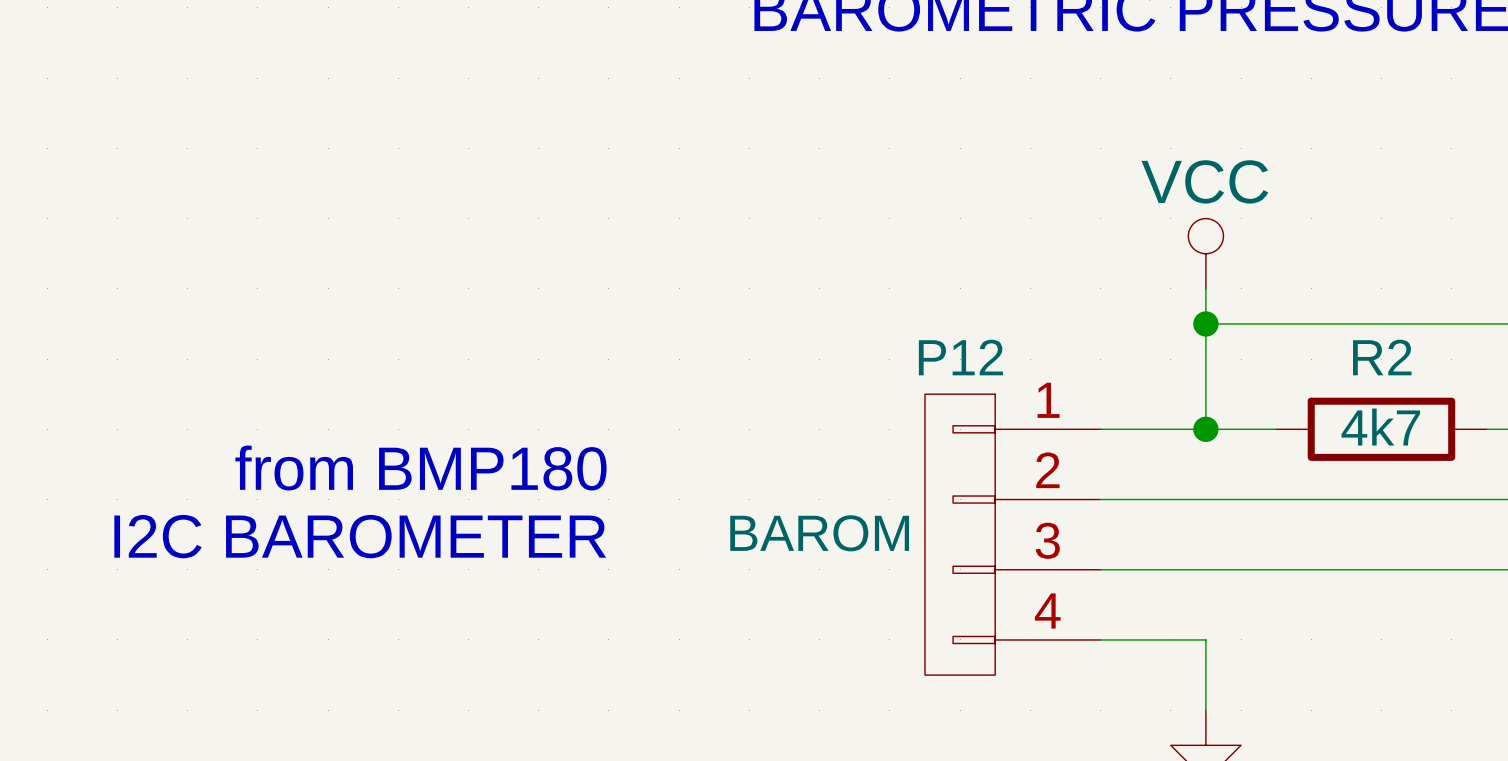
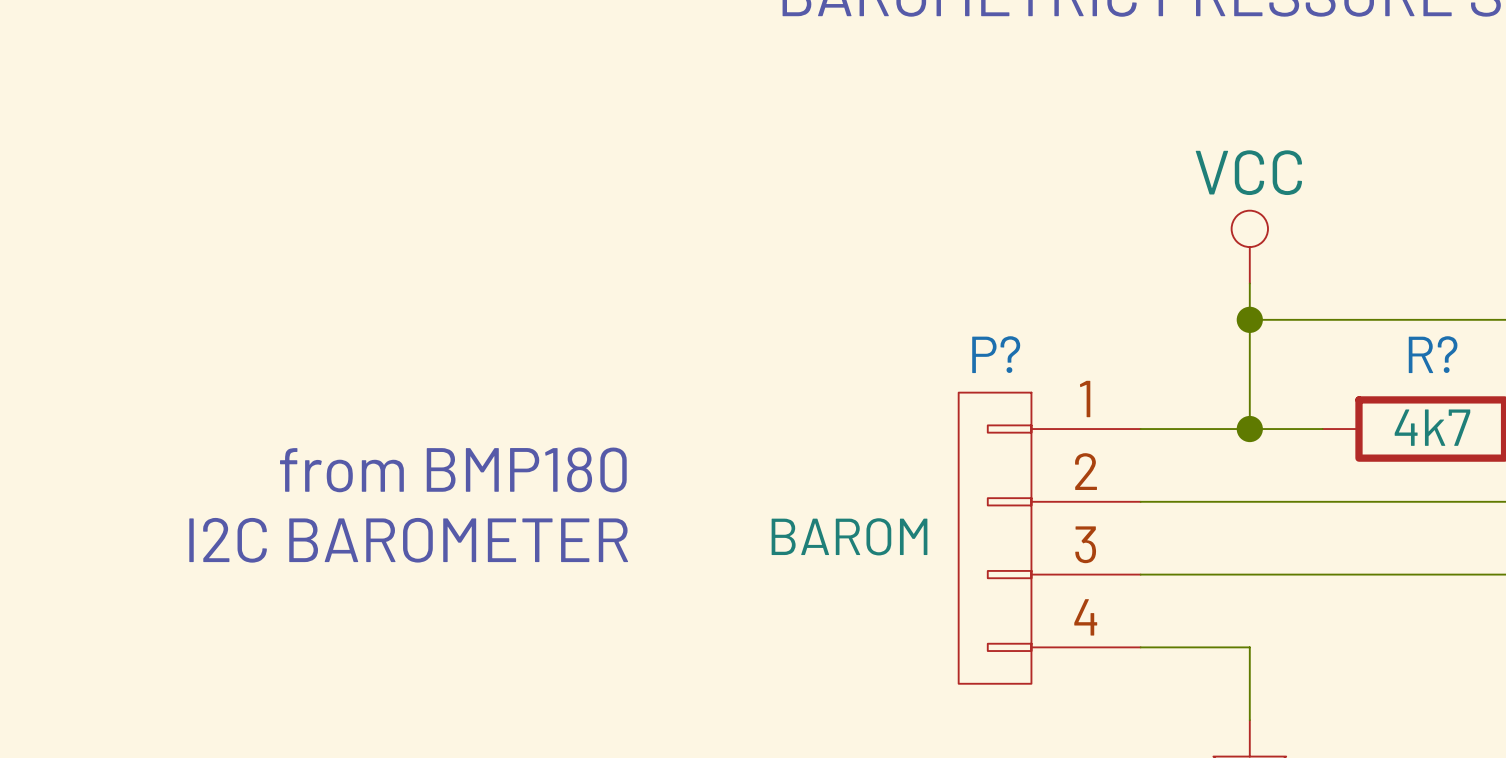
P12 name: P12 (960, 357) -> P? (996, 354)
R2 name: R2 (1382, 357) -> R? (1433, 354)

